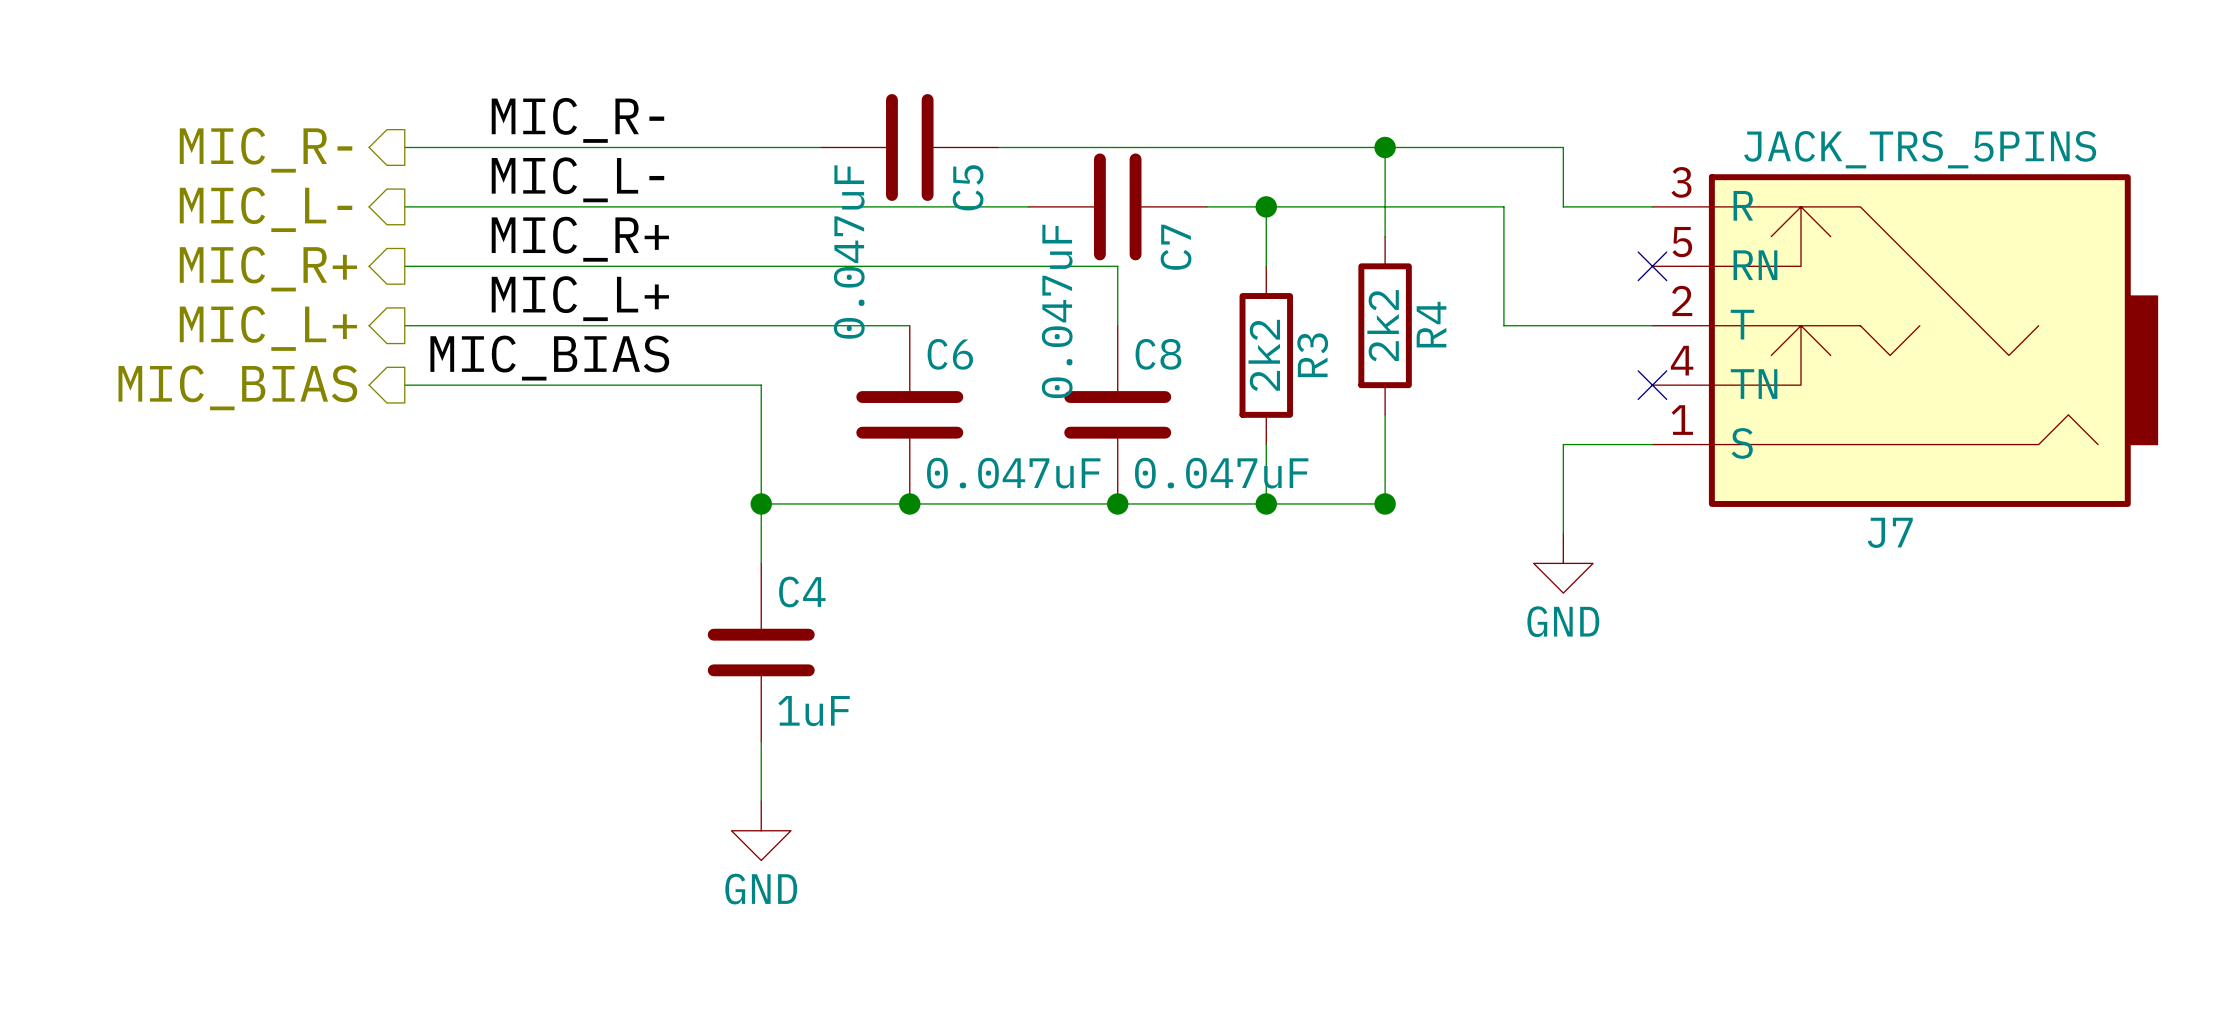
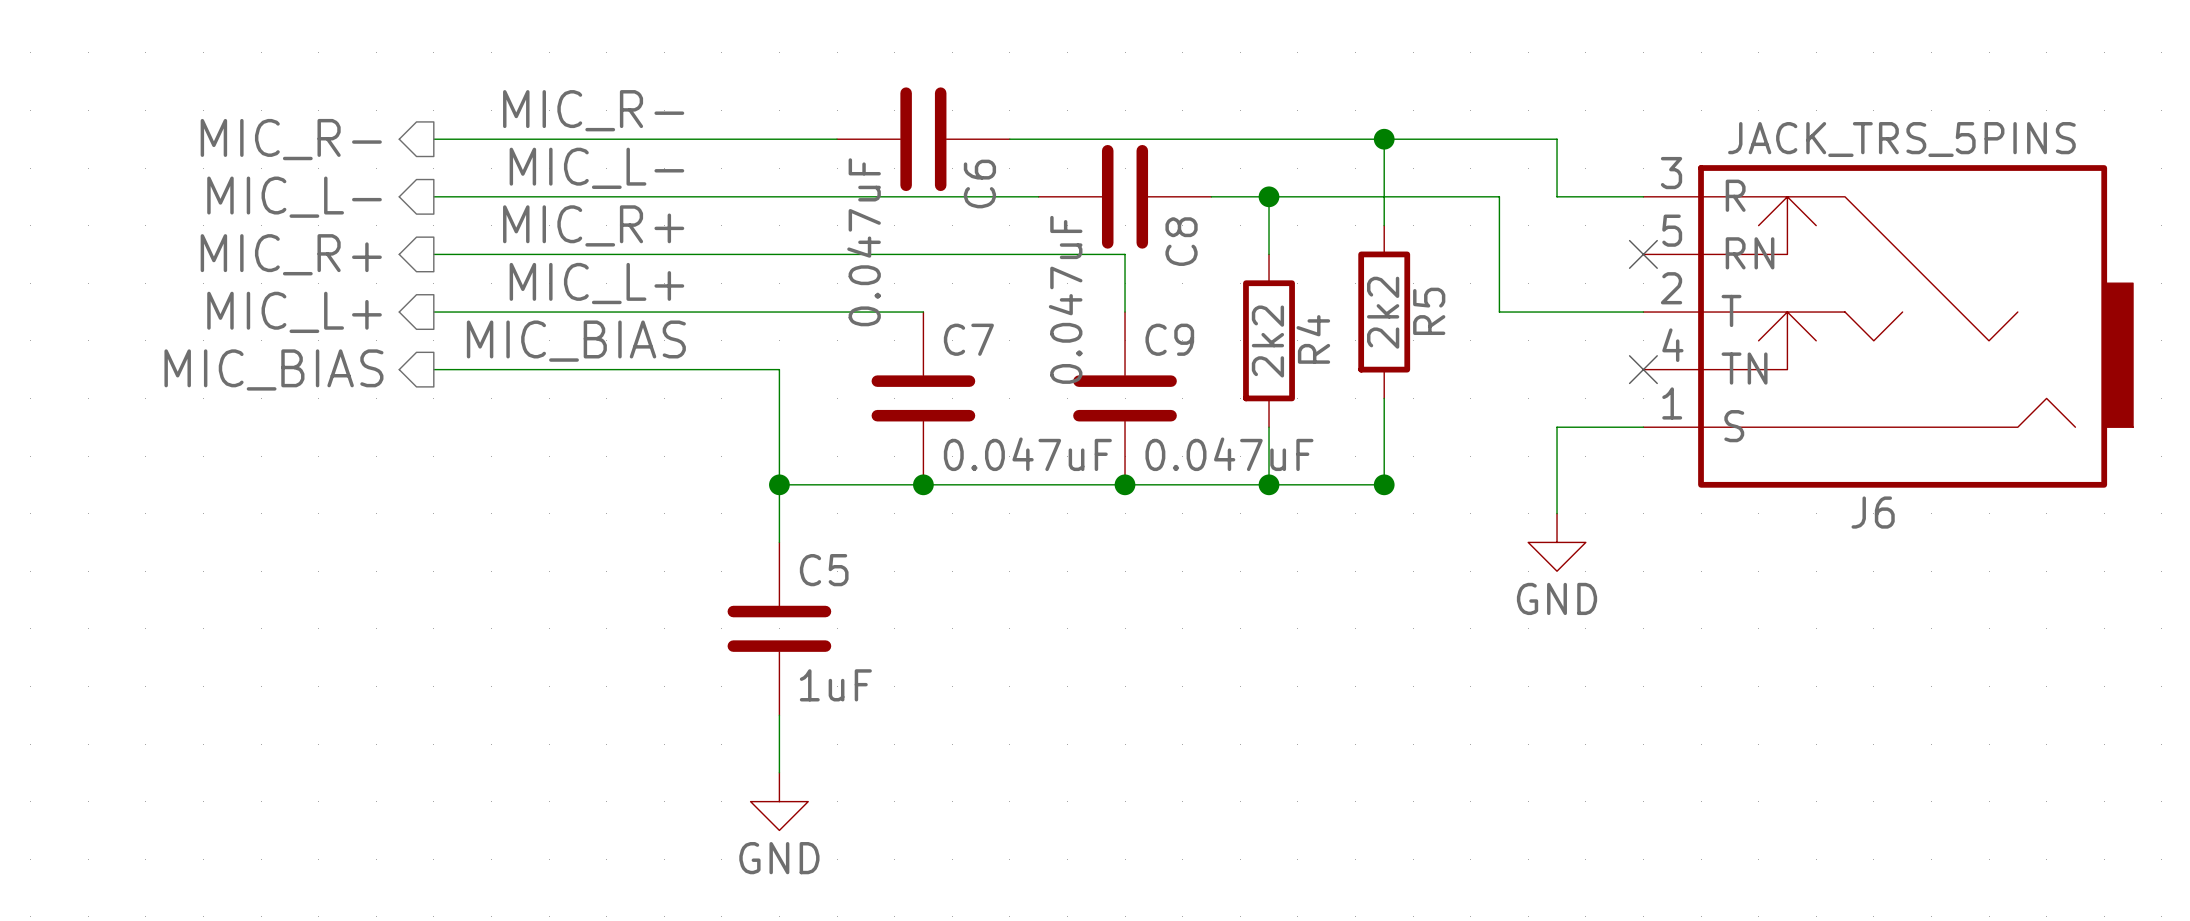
C5 name: C5 (968, 187) -> C6 (979, 184)
C7 name: C7 (1176, 247) -> C8 (1181, 241)
R4 name: R4 (1431, 324) -> R5 (1429, 311)
C6 name: C6 (950, 354) -> C7 (968, 339)
C8 name: C8 (1158, 354) -> C9 (1169, 339)
R3 name: R3 (1312, 355) -> R4 (1313, 339)
J7 name: J7 (1890, 532) -> J6 (1873, 512)
C4 name: C4 (802, 591) -> C5 (824, 570)

